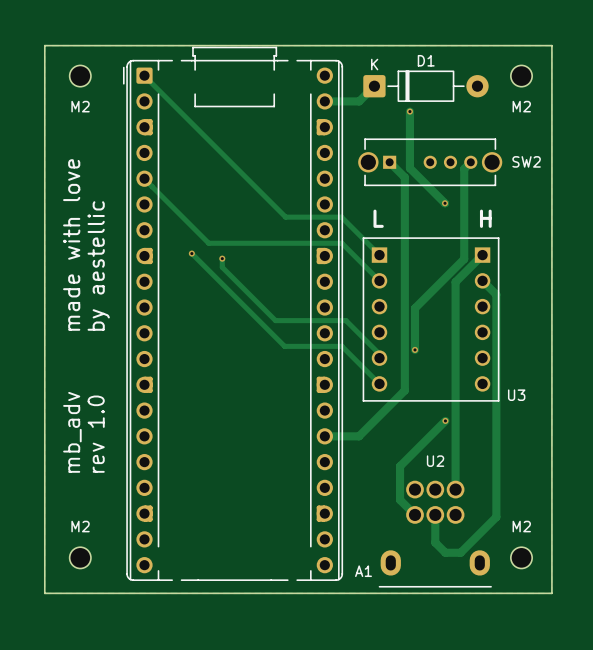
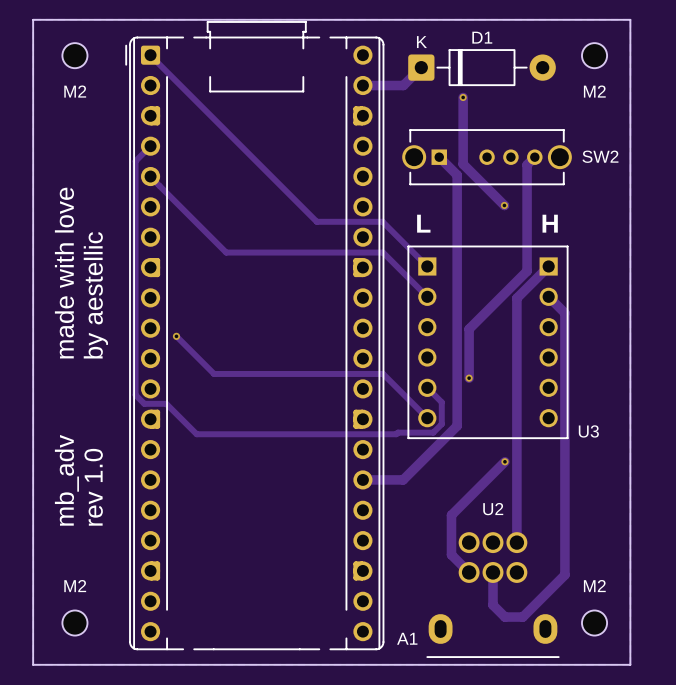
track: none -> (150, 146) (135, 161) (135, 395) (144, 403) (166, 403) (196, 434) (433, 432) (441, 424) (441, 402) (427, 387)
track: (191, 253) (284, 346) -> (176, 336) (214, 373) (315, 373)
via: (191, 253) -> none
track: (222, 258) (222, 267) (275, 320) (346, 320) (379, 354) -> none
via: (222, 258) -> none
via: none -> (176, 336)

